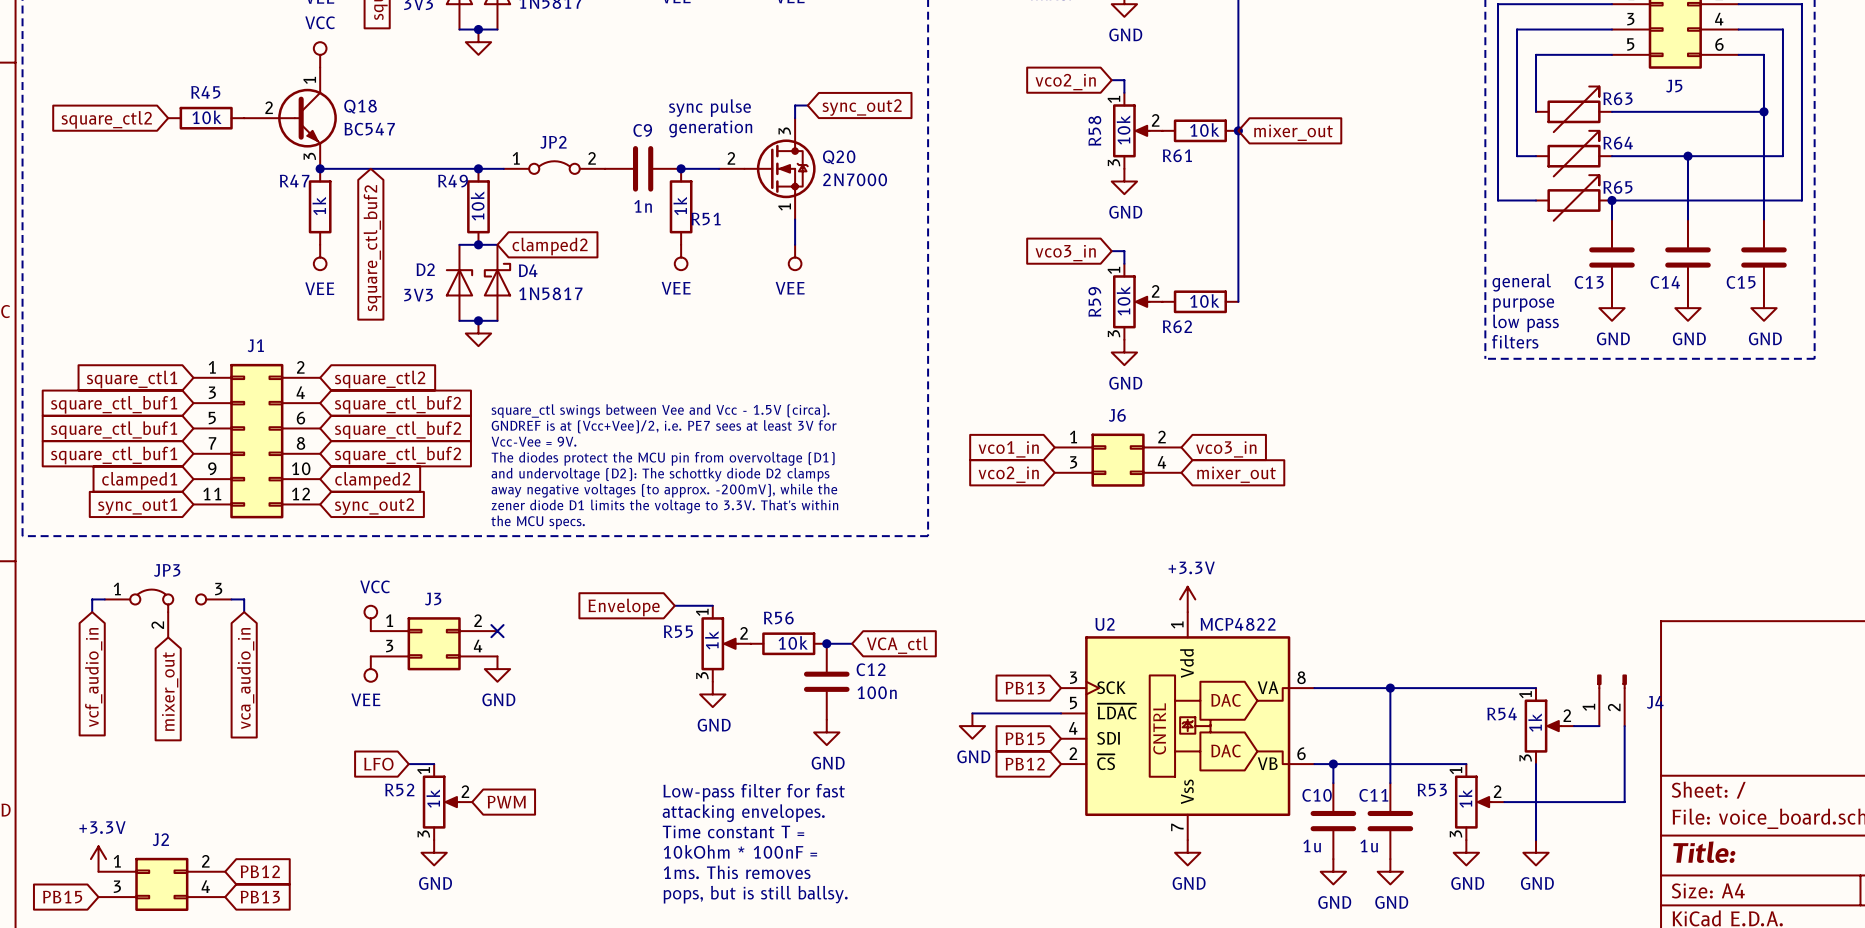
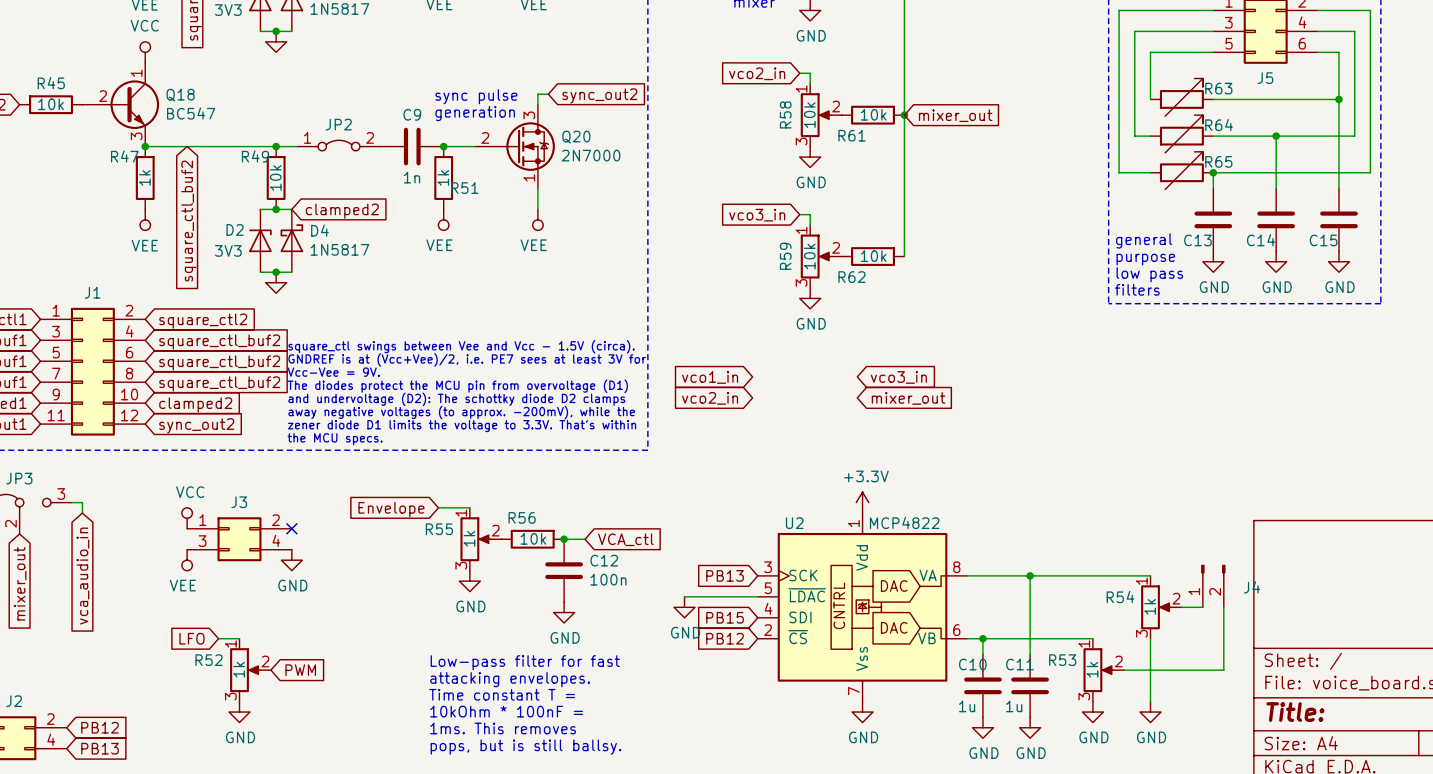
J6: (1118, 460) -> none

